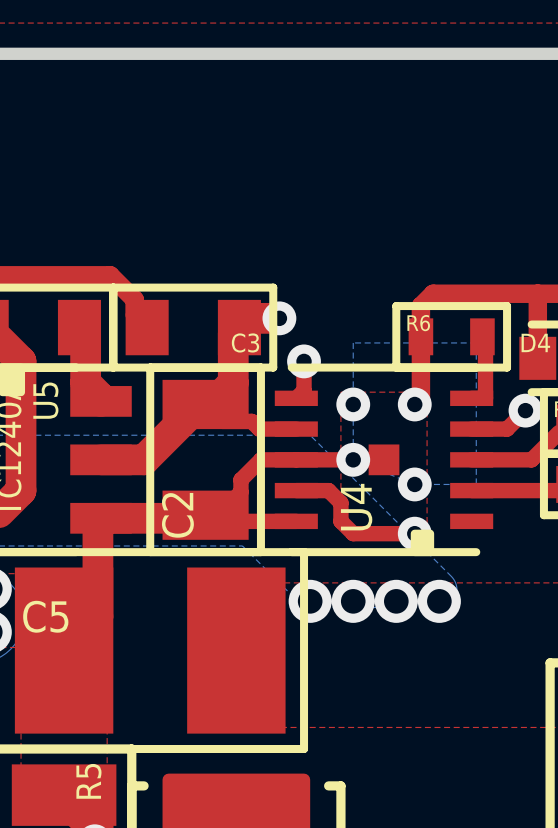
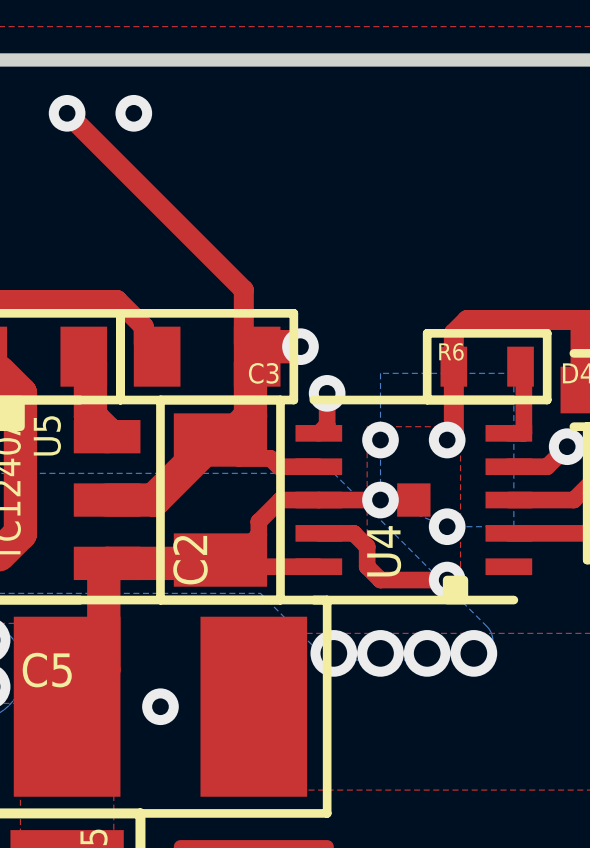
top track: none -> (67, 113) (243, 290) (243, 343) (257, 356)
via: none -> (67, 113)
via: none -> (133, 113)
via: none -> (160, 706)

